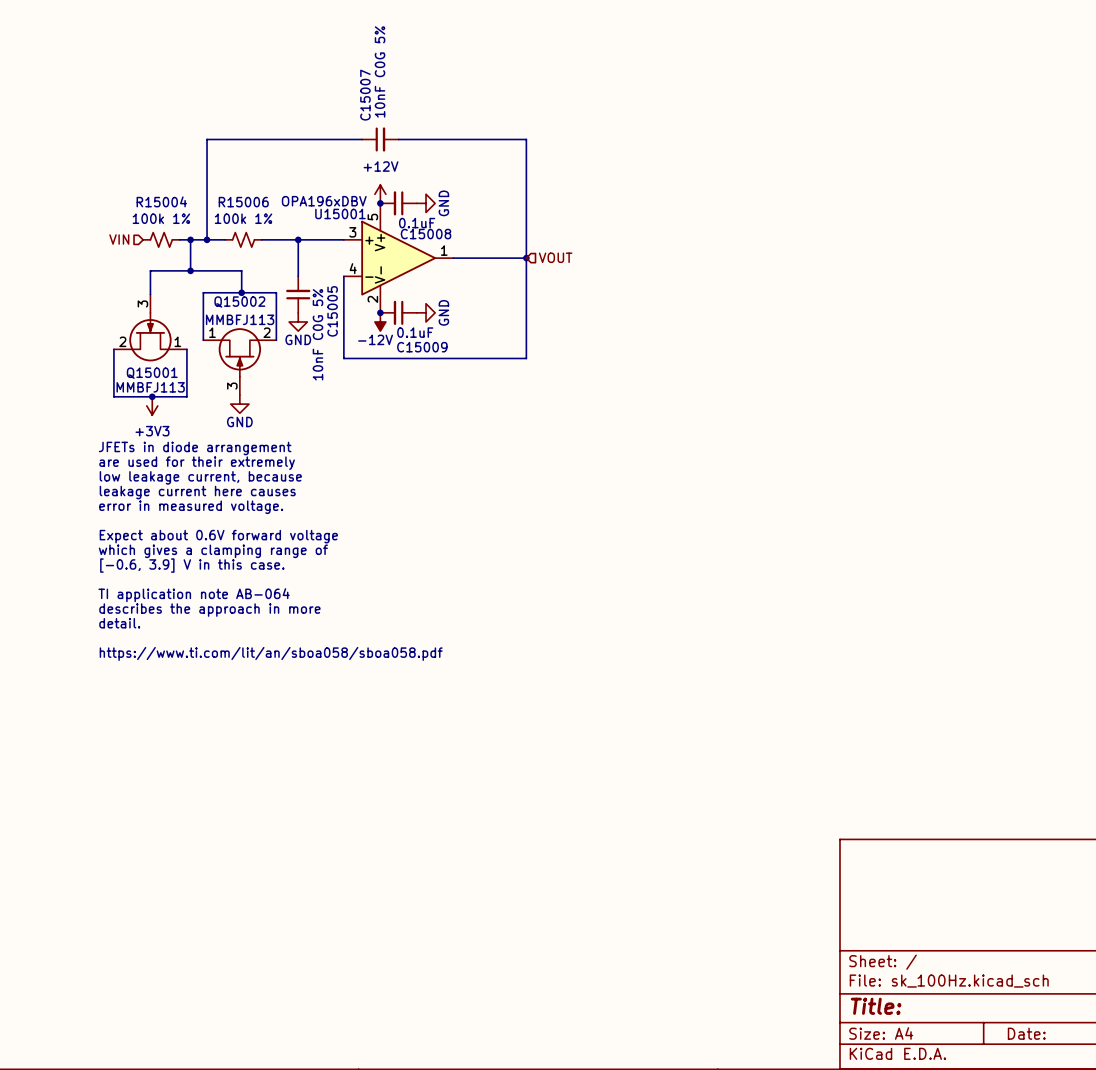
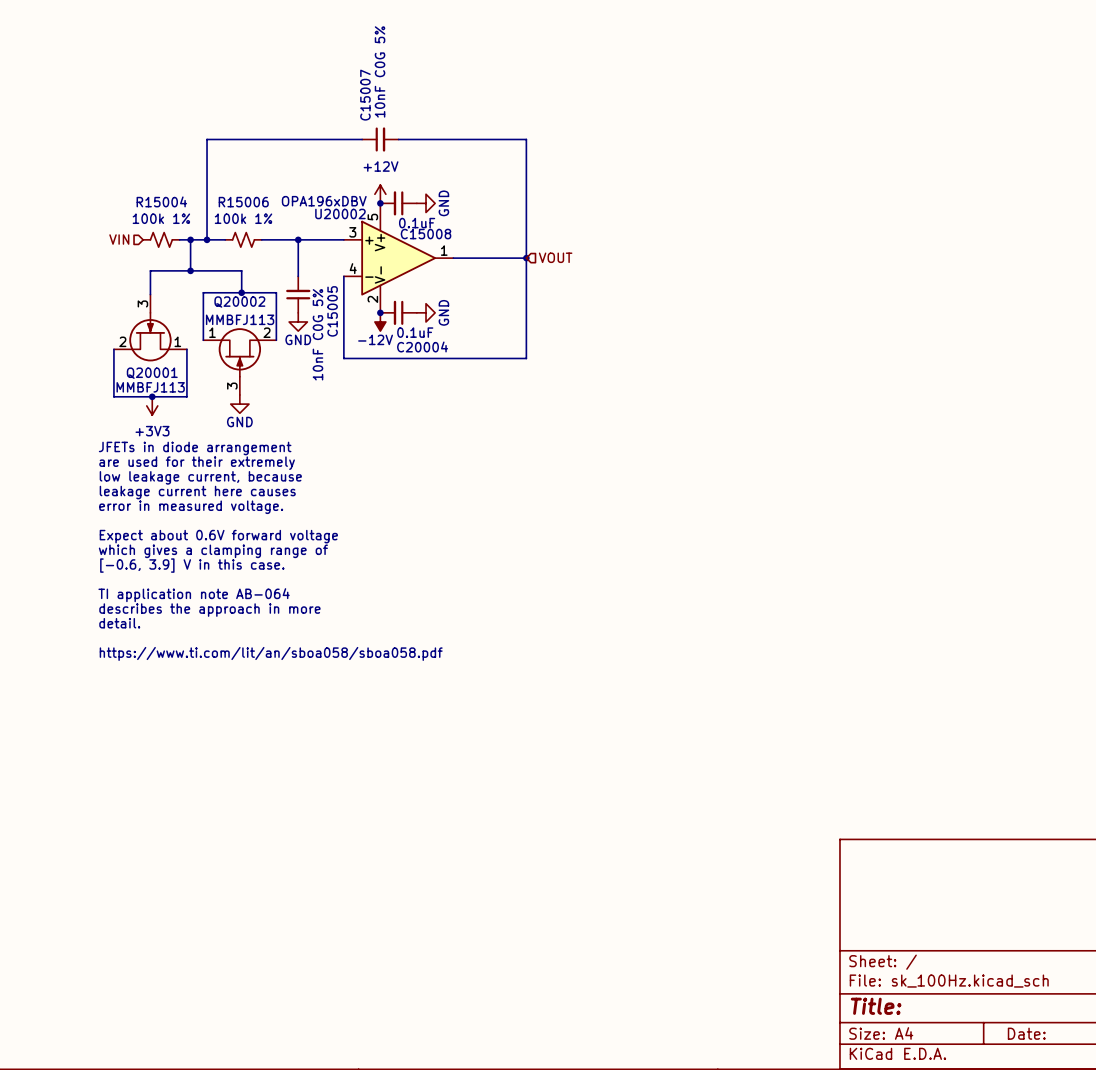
U15001 name: U15001 (340, 213) -> U20002 (340, 213)
Q15002 name: Q15002 (239, 302) -> Q20002 (239, 302)
C15009 name: C15009 (422, 347) -> C20004 (422, 346)
Q15001 name: Q15001 (152, 373) -> Q20001 (152, 373)

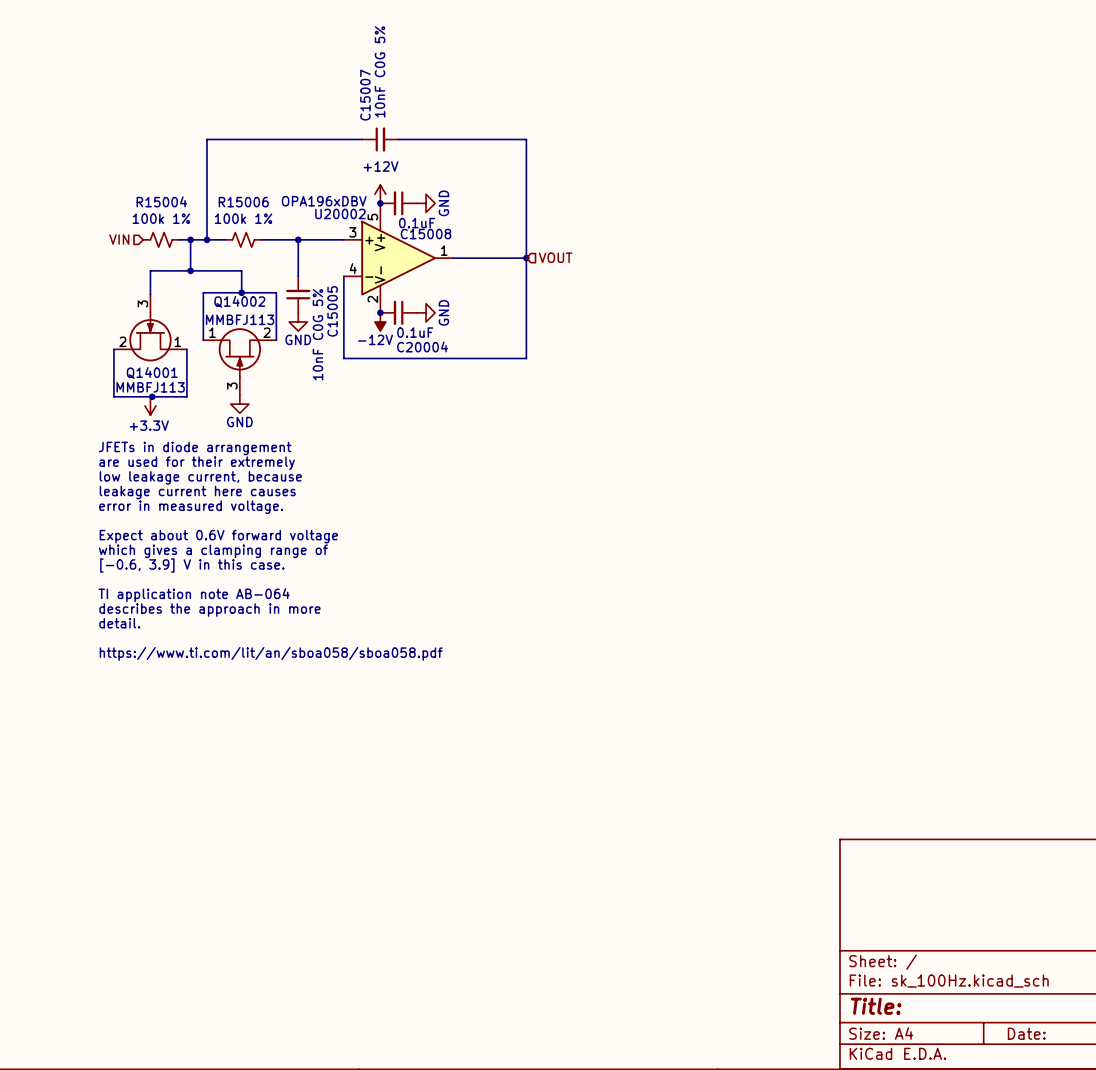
Q20002 name: Q20002 (239, 302) -> Q14002 (239, 301)
Q20001 name: Q20001 (152, 373) -> Q14001 (152, 372)
power symbol: +3V3 (152, 405) -> +3.3V (150, 405)

